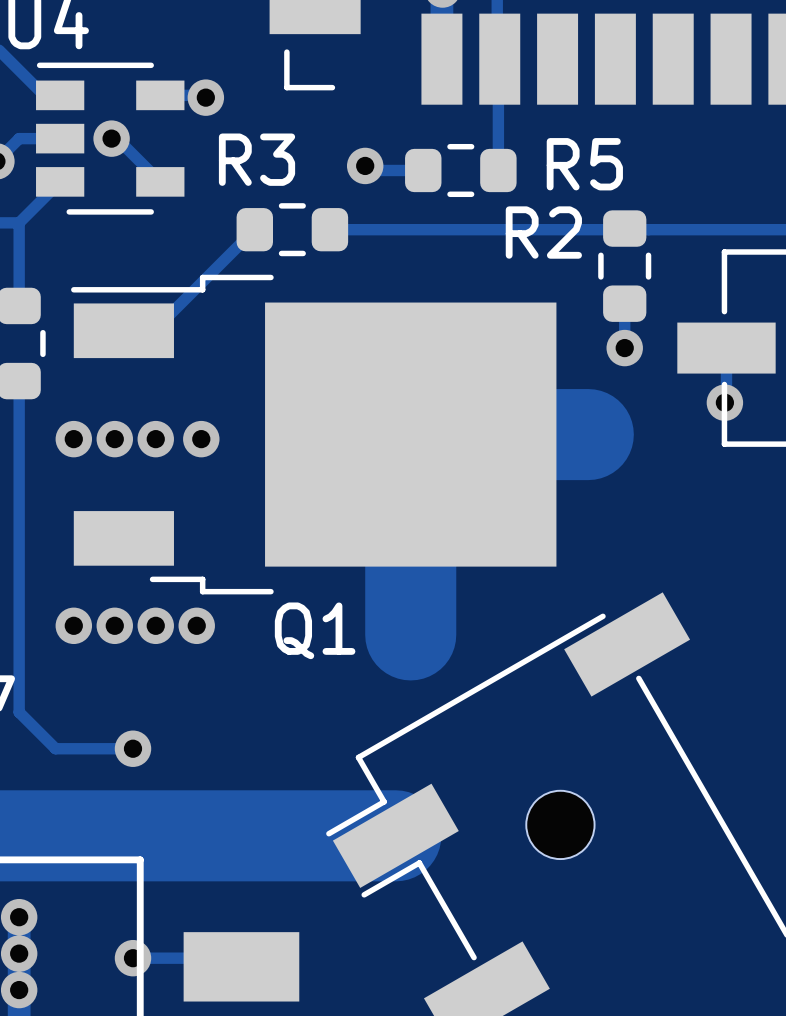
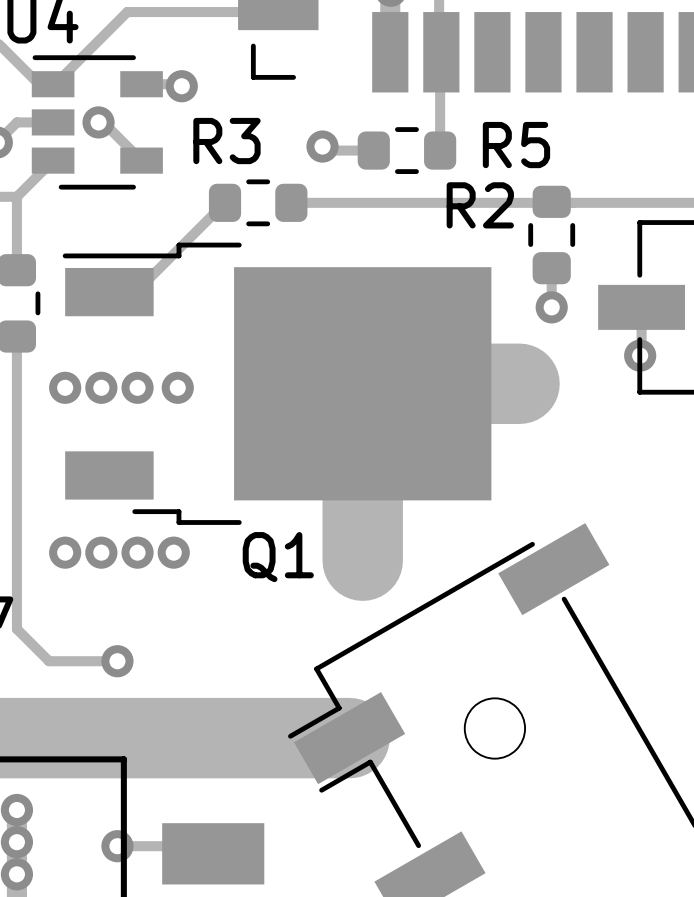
track: none -> (278, 12) (127, 12) (55, 84)

